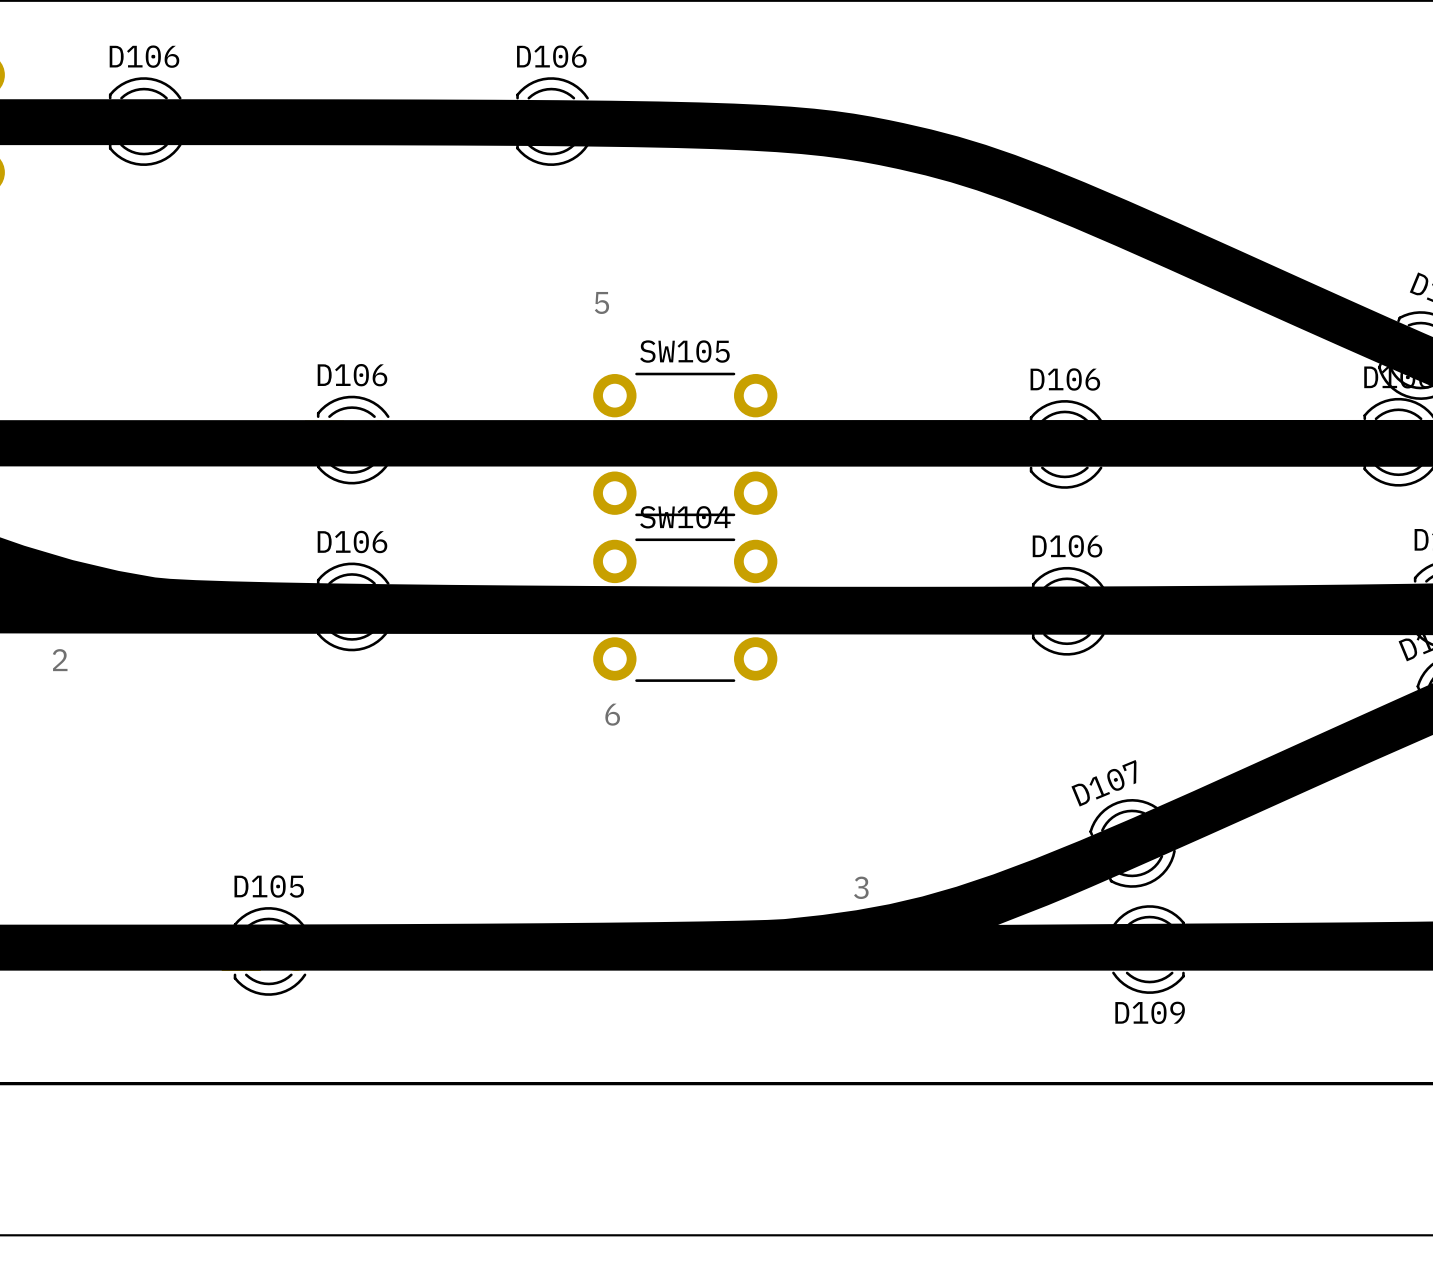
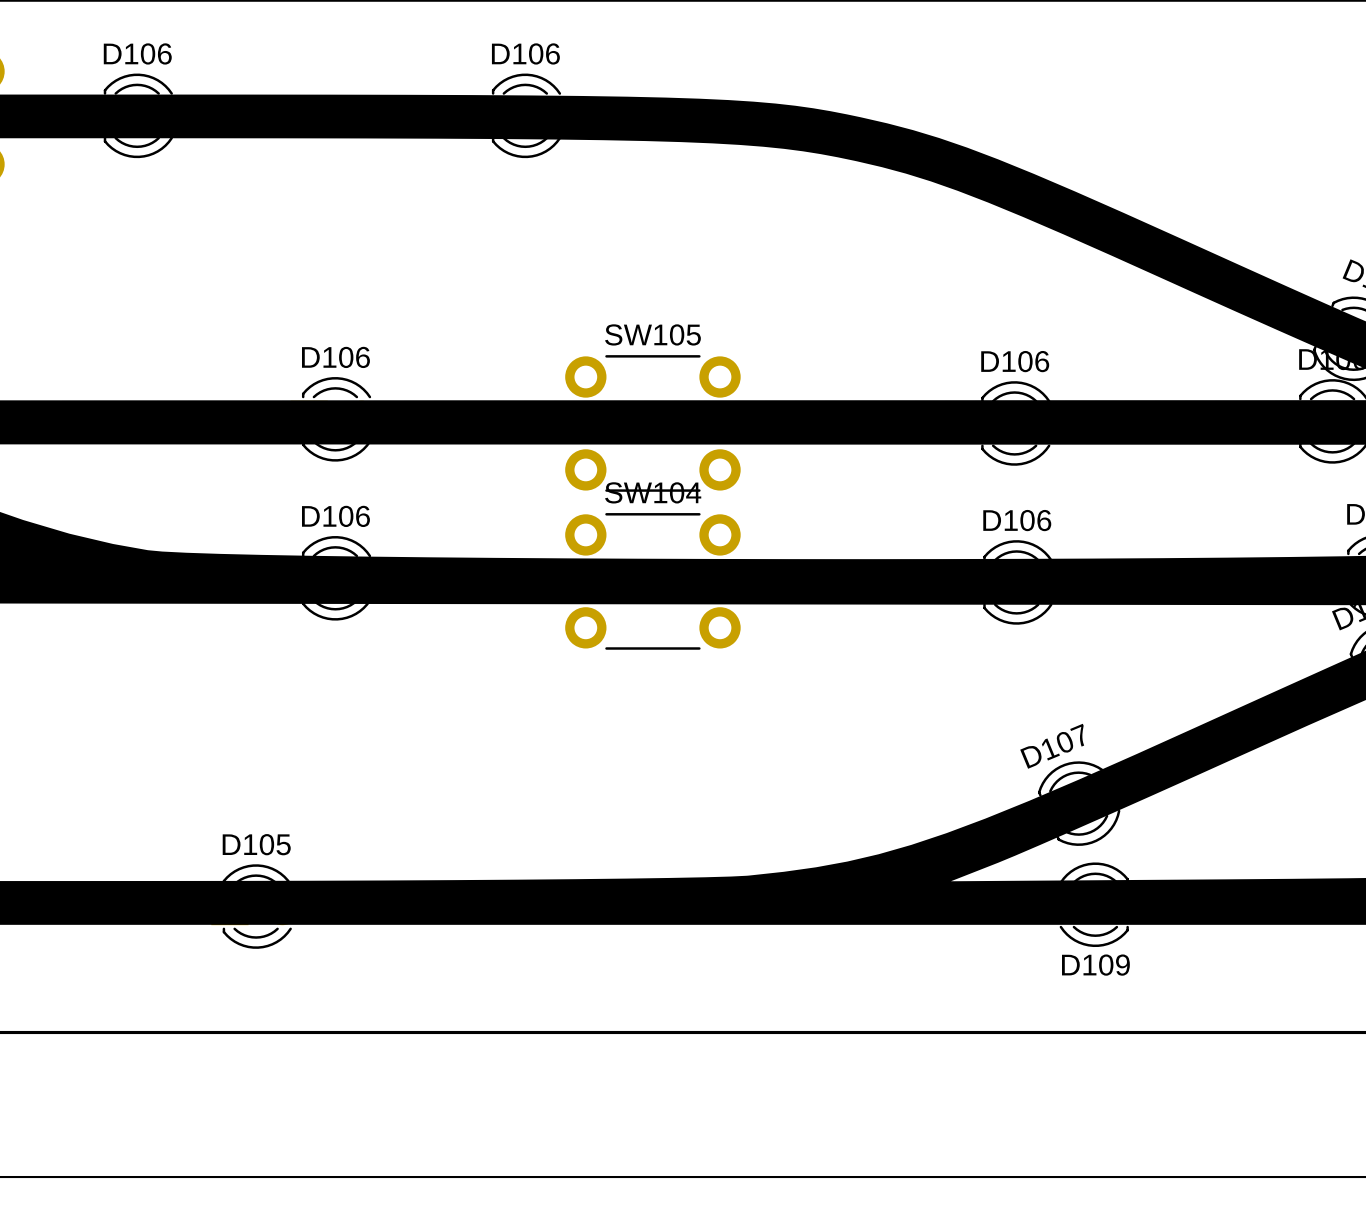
text: 5 (601, 302) -> none
text: 2 (60, 660) -> none
text: 6 (612, 714) -> none
text: 3 (861, 887) -> none

